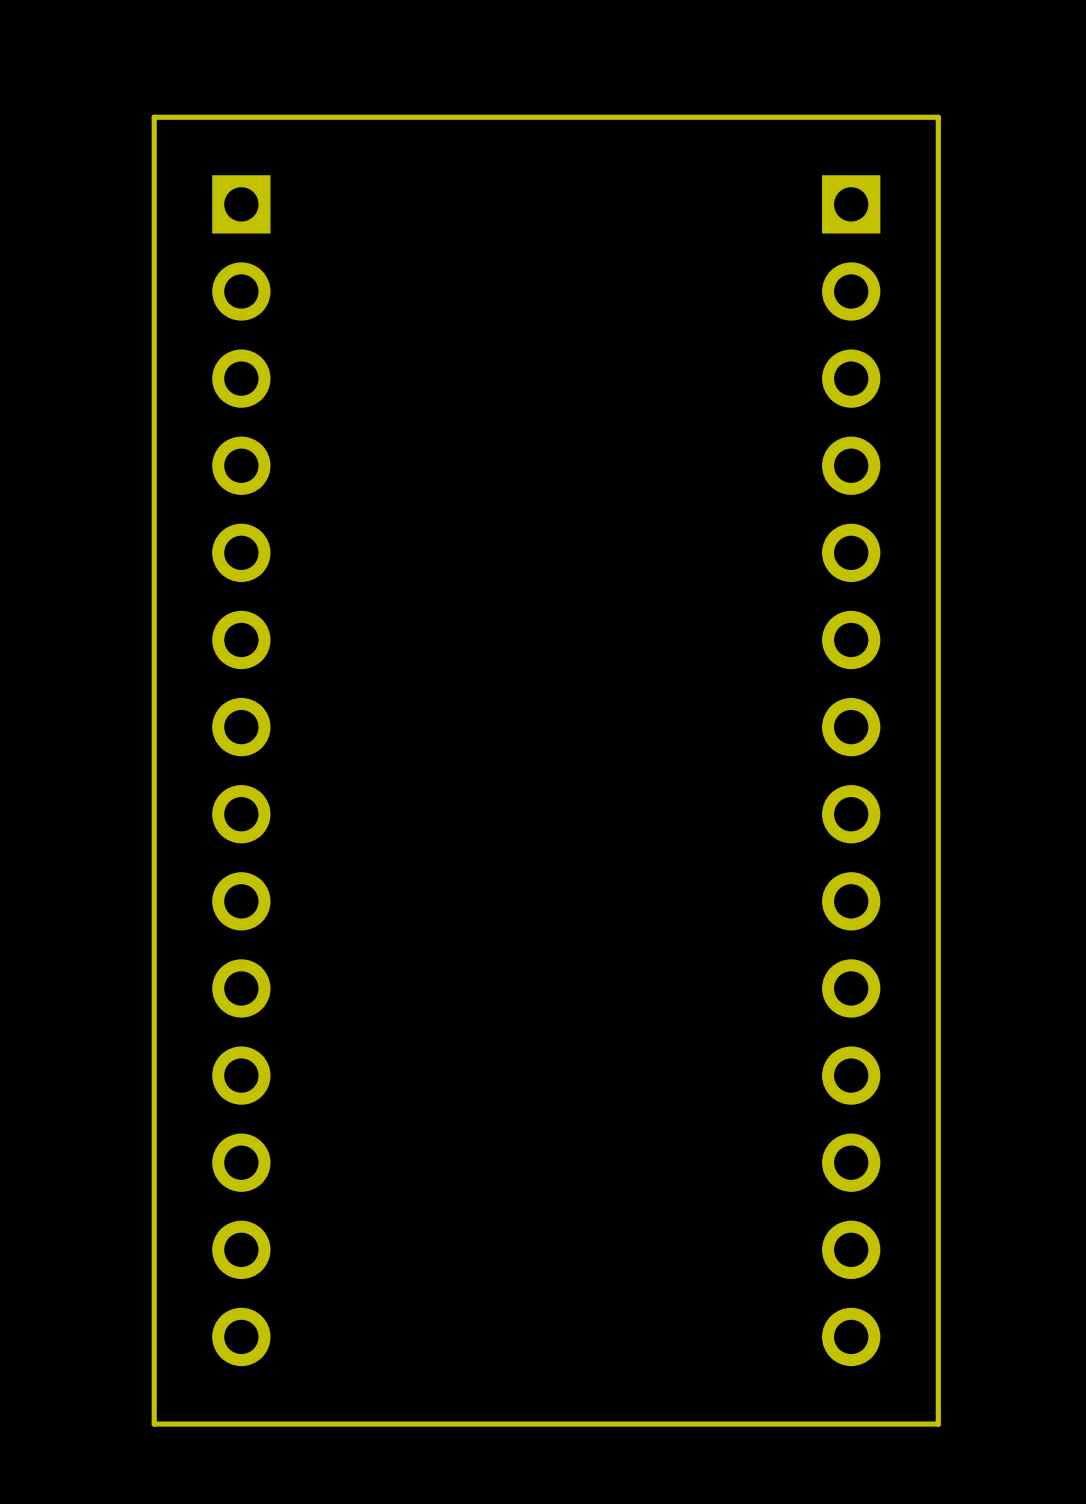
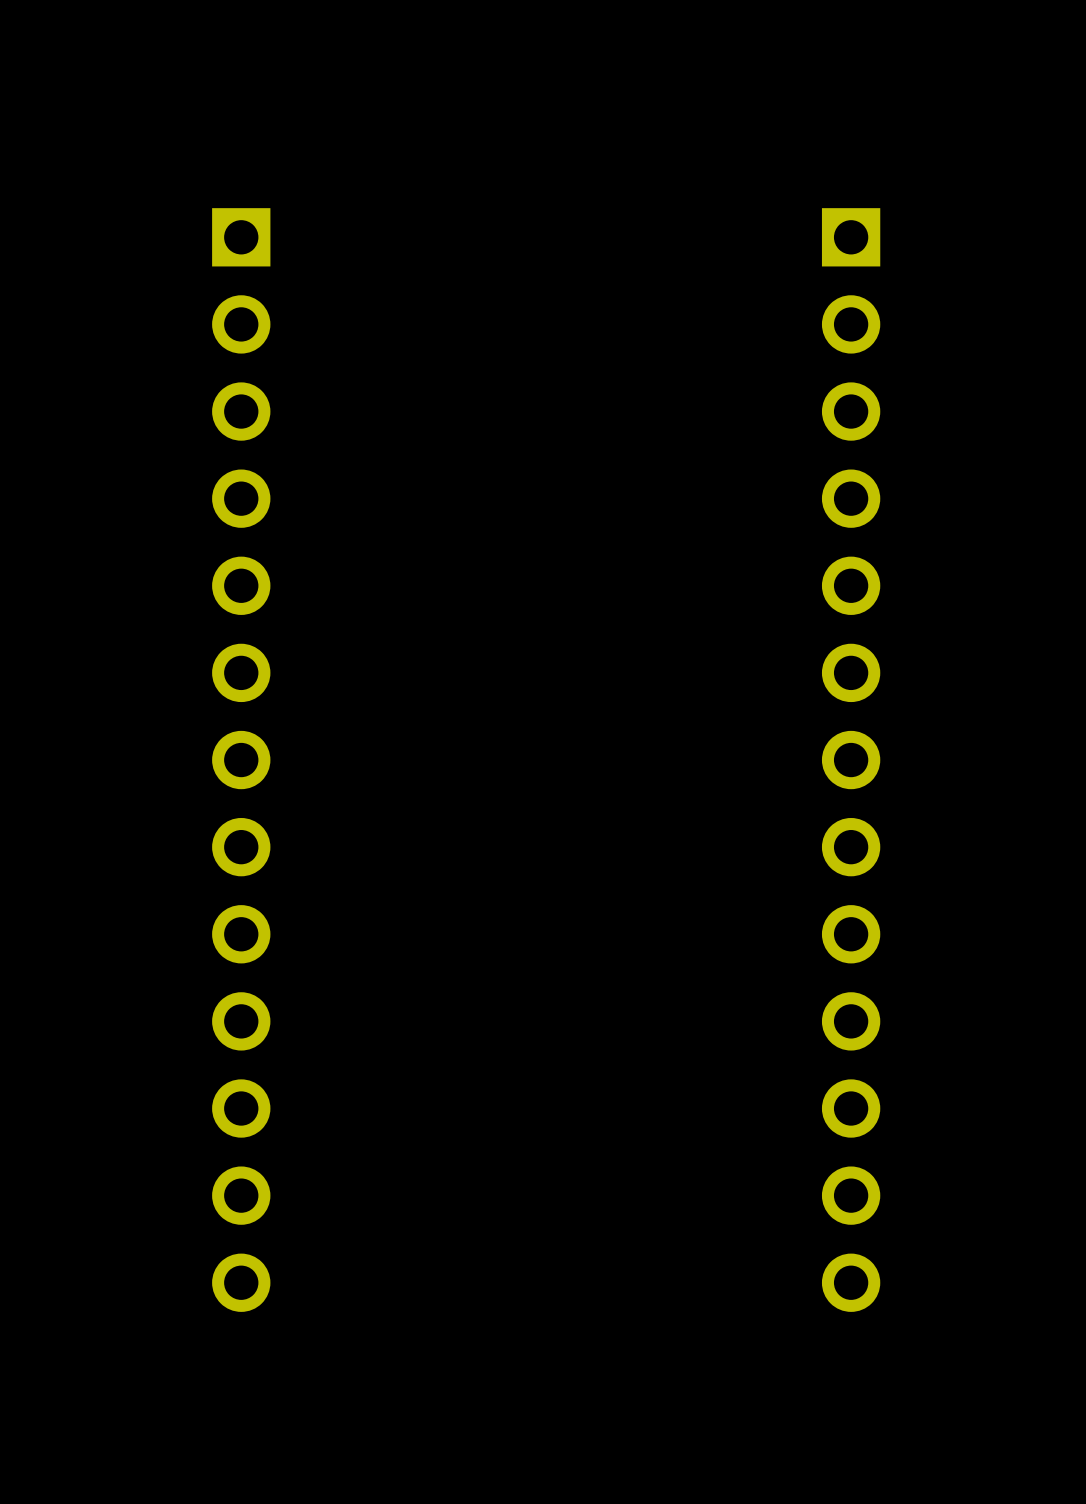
board edge: (938, 117) (154, 117) (154, 1424) (938, 1424) (938, 117) -> none
part footprint: [212, 175, 271, 1367] -> [212, 208, 271, 1312]
part footprint: [822, 175, 881, 1367] -> [821, 208, 881, 1312]

